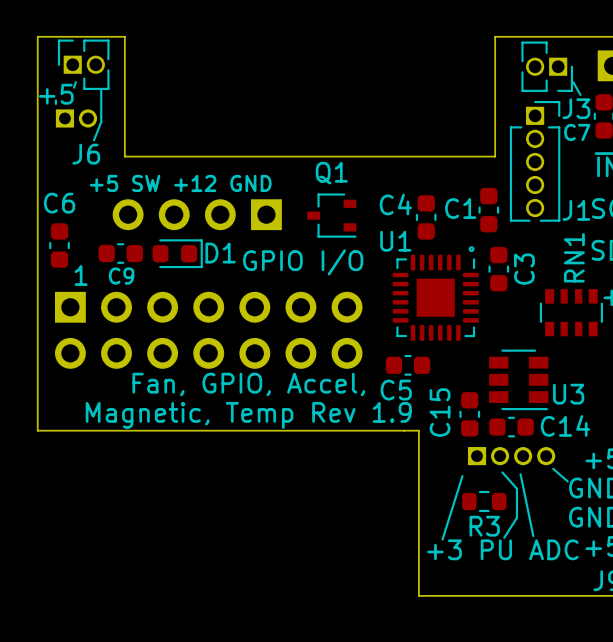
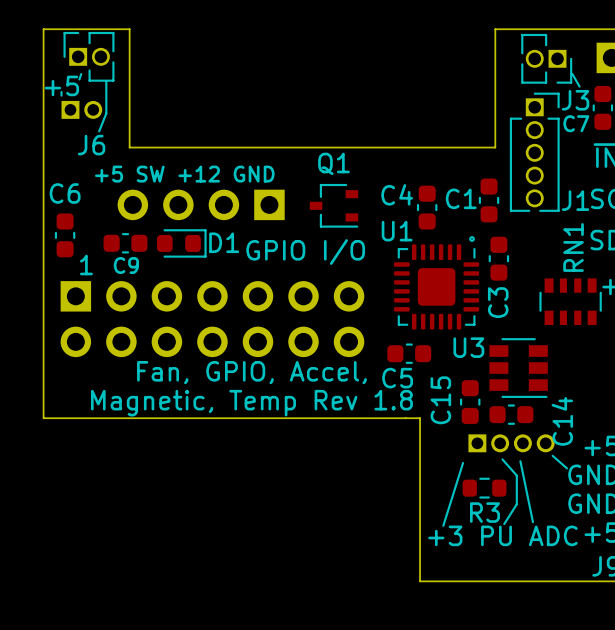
U1 footprint: [392, 254, 479, 341] -> [394, 244, 480, 330]
C3 name position: C3 (524, 269) -> C3 (498, 302)
U3 name position: U3 (568, 394) -> U3 (468, 347)
text: Magnetic, Temp Rev 1.9 (248, 415) -> Magnetic, Temp Rev 1.8 (251, 403)
C14 name rotation: 0° (565, 425) -> 90° counterclockwise (562, 421)

